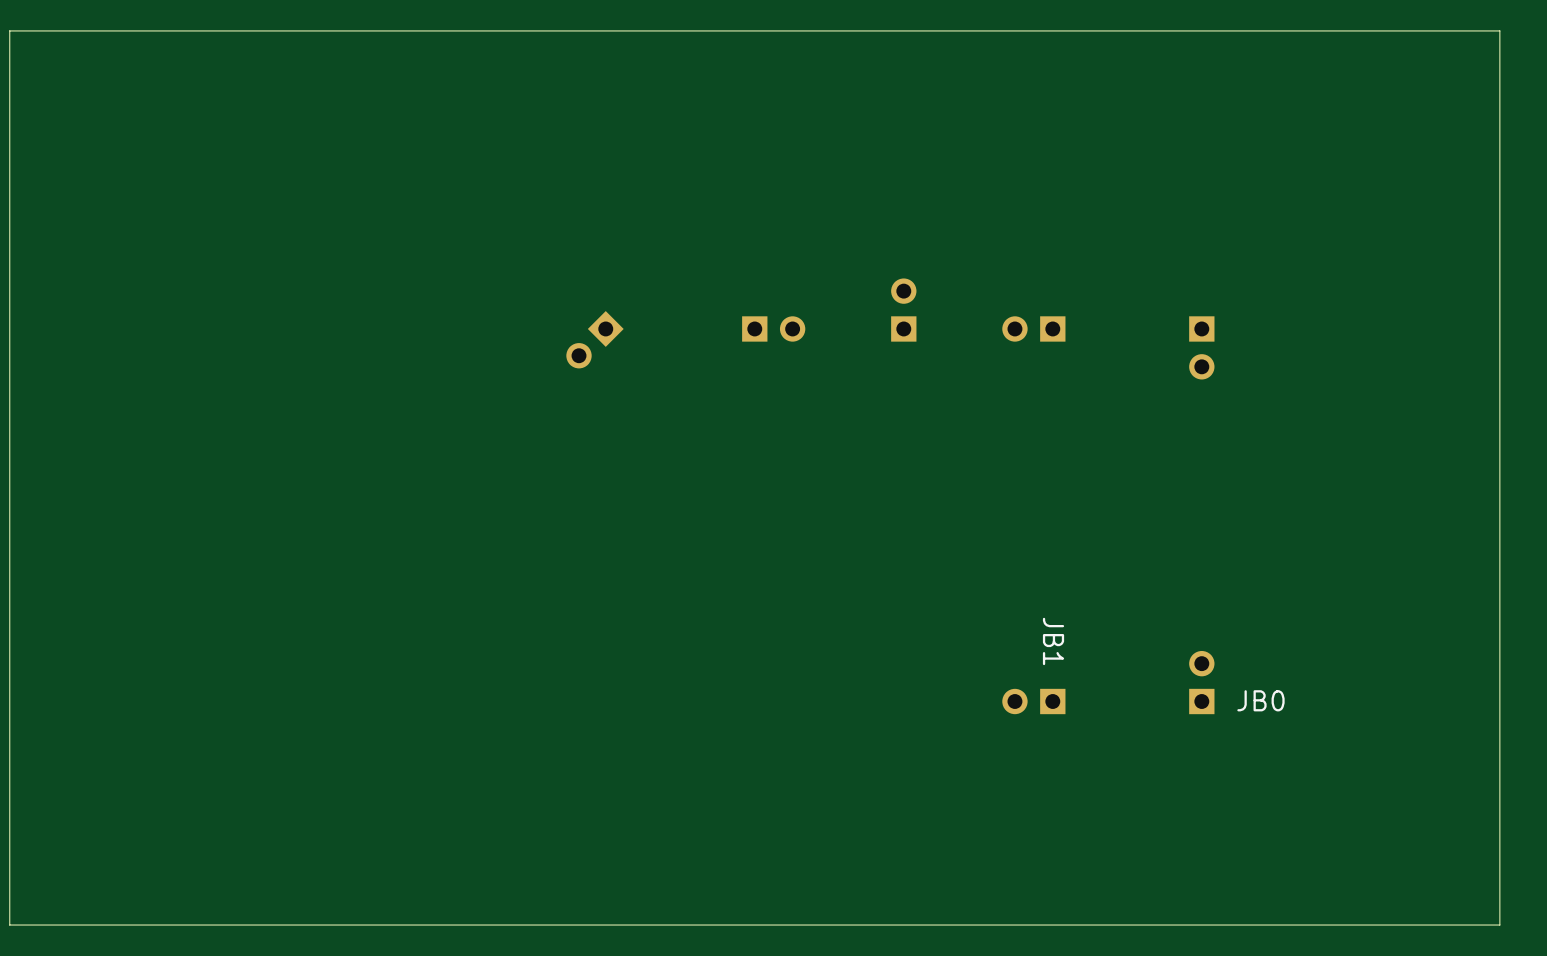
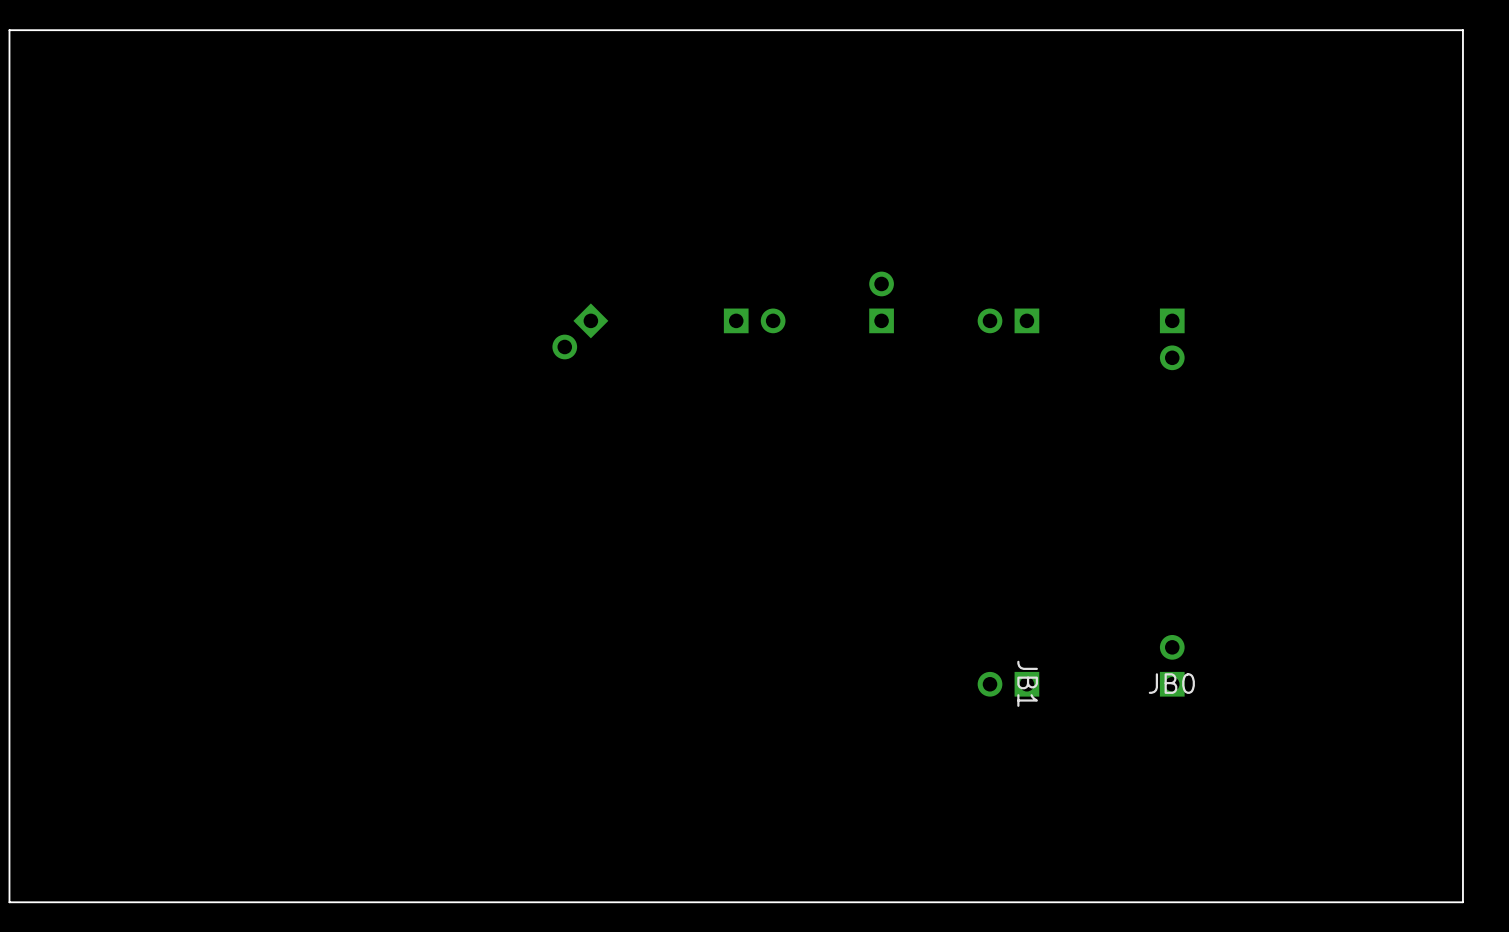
JB1 name position: JB1 (1053, 641) -> JB1 (1027, 683)
JB0 name position: JB0 (1260, 700) -> JB0 (1171, 683)

